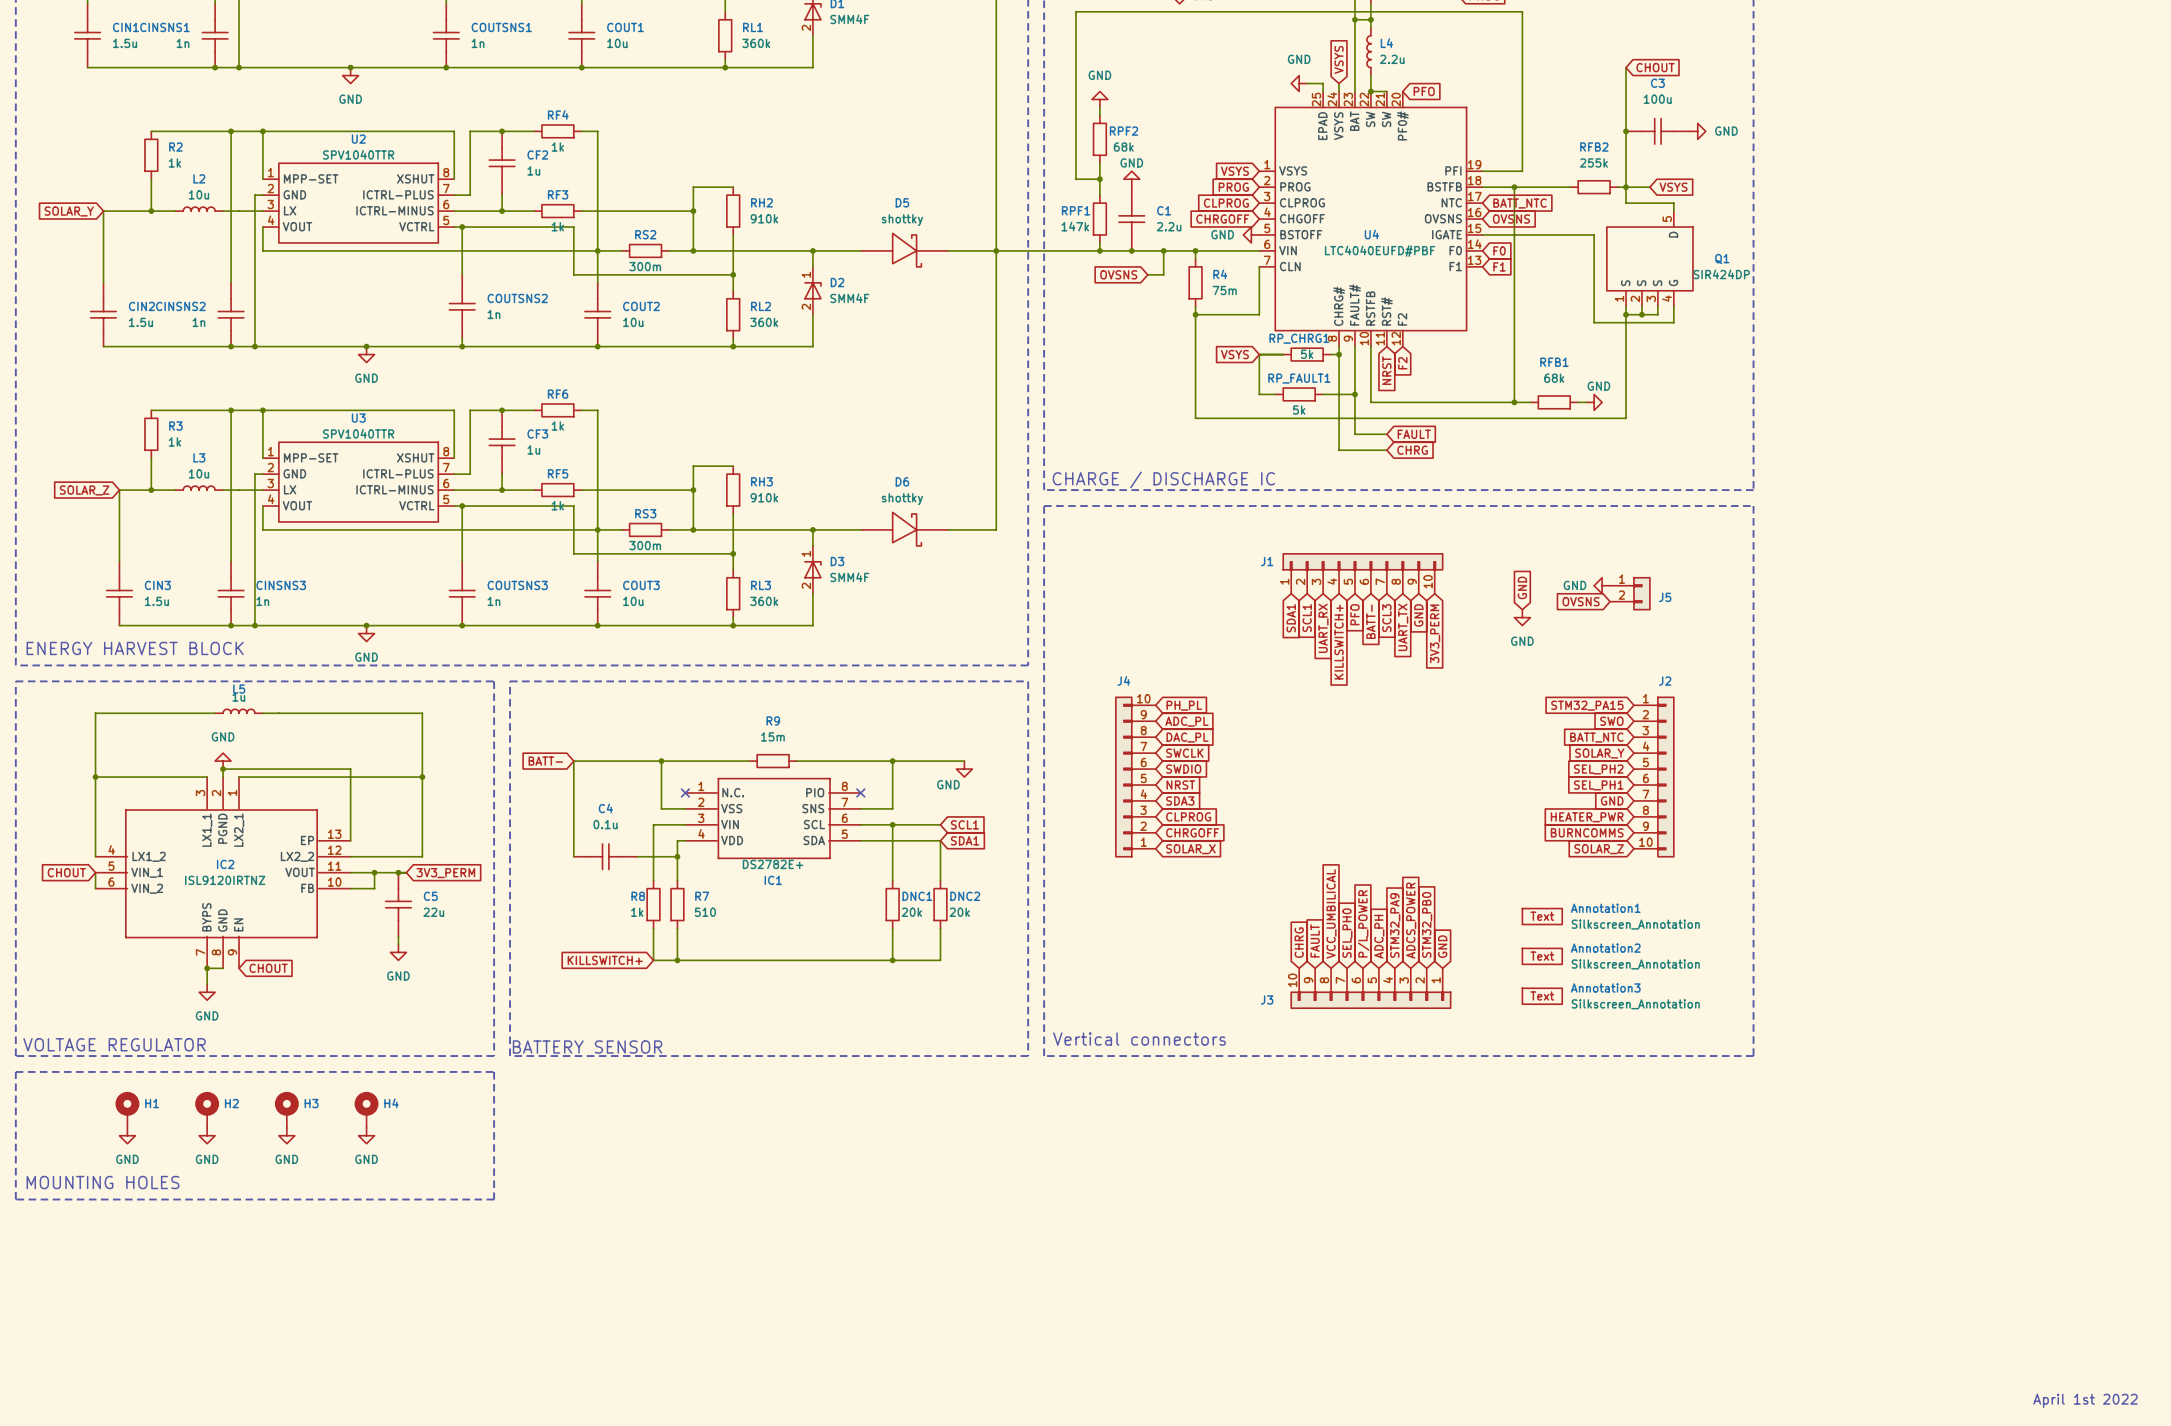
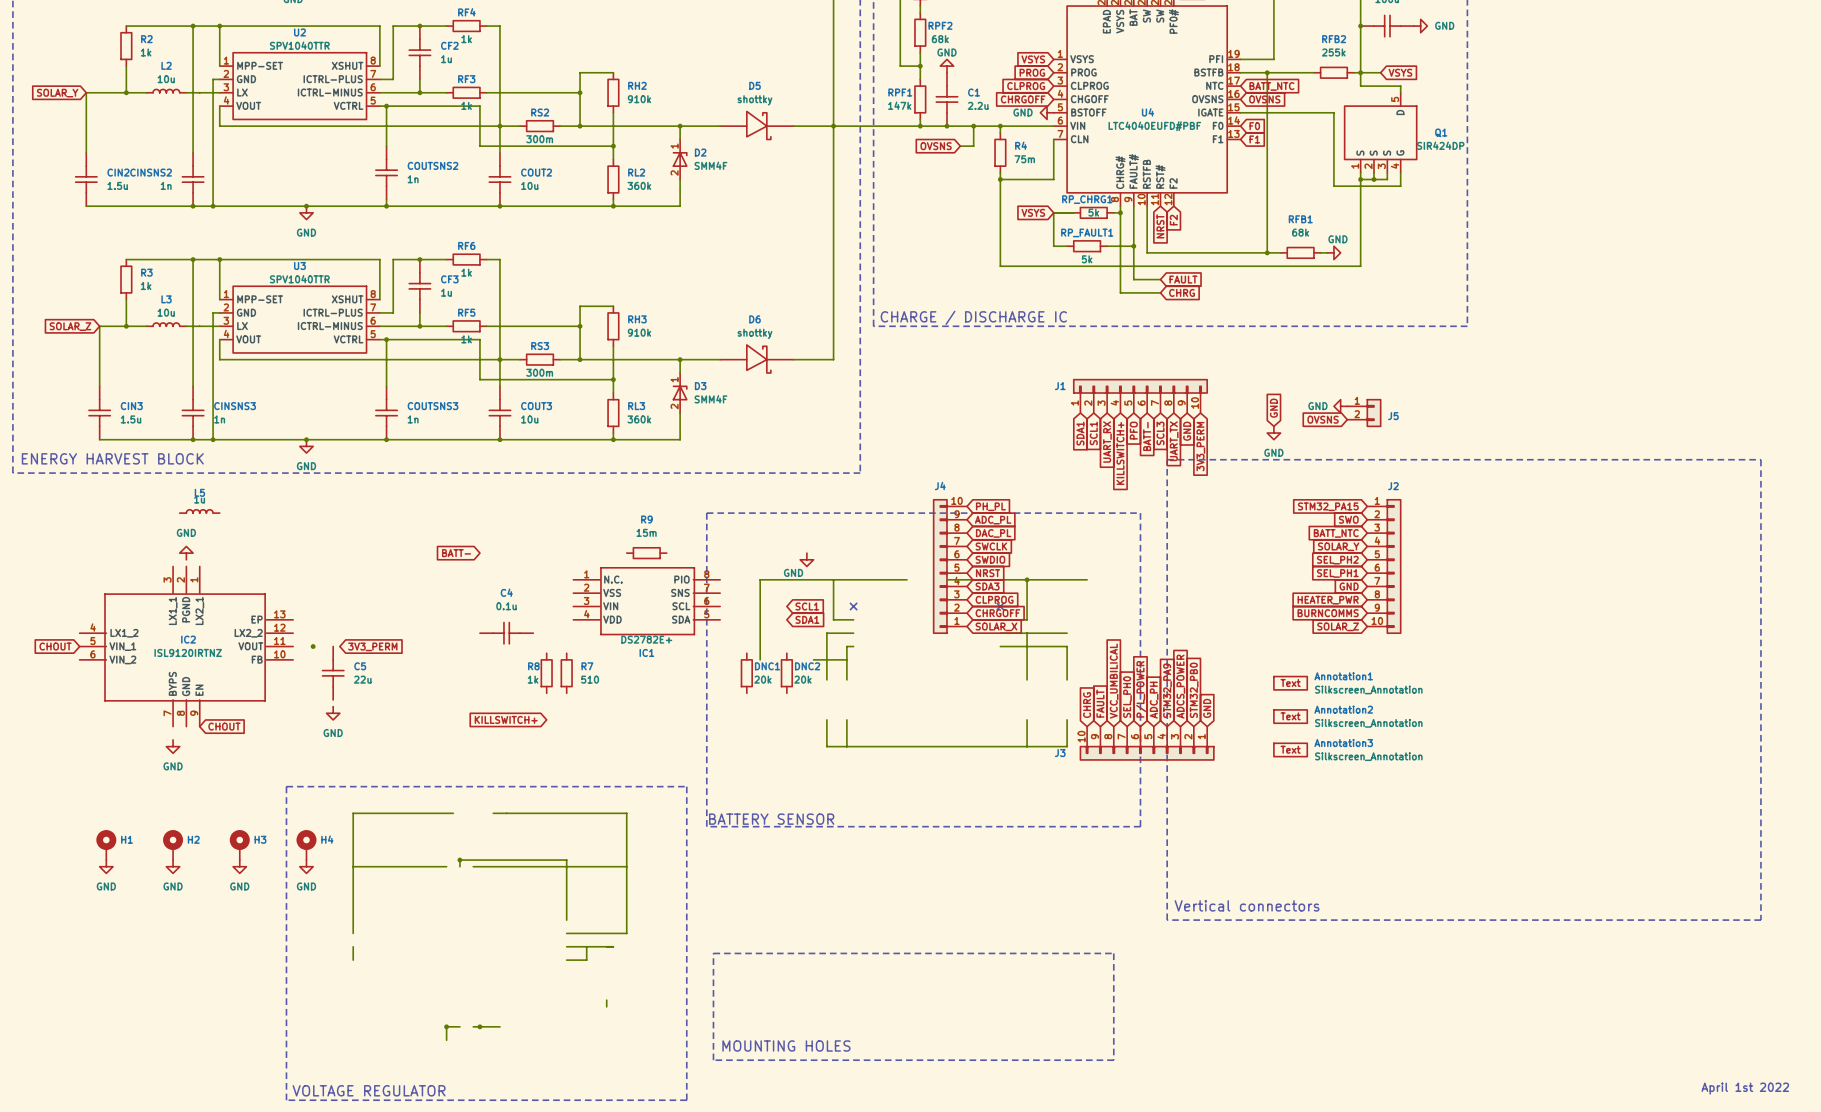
line: (1044, 506) (1753, 506) (1753, 1056) (1044, 1056) (1044, 506) -> none
line: none -> (1167, 459) (1760, 459) (1760, 920) (1167, 920) (1167, 459)
line: (15, 681) (494, 681) (494, 1056) (15, 1056) (15, 681) -> none
line: (510, 681) (1028, 681) (1028, 1056) (510, 1056) (510, 681) -> none
wire: (215, 713) (95, 713) (95, 856) -> none
wire: (262, 713) (422, 713) (422, 856) (350, 856) -> none
line: none -> (706, 513) (1140, 513) (1140, 826) (706, 826) (706, 513)
wire: (661, 761) (661, 808) (685, 808) -> none
junction: (661, 761) -> none
wire: (749, 761) (573, 761) (573, 856) -> none
wire: (797, 761) (964, 761) -> none
wire: (892, 761) (892, 808) (860, 808) -> none
junction: (892, 761) -> none
junction: (223, 769) -> none
wire: (95, 777) (207, 777) -> none
junction: (95, 777) -> none
wire: (223, 777) (223, 769) (350, 769) (350, 840) -> none
wire: (239, 777) (422, 777) -> none
junction: (422, 777) -> none
no-connect mark: (685, 792) -> none
no-connect mark: (860, 792) -> none
wire: none -> (833, 579) (833, 619) (853, 619)
wire: none -> (906, 579) (760, 579) (760, 659)
wire: none -> (946, 579) (1087, 579)
wire: none -> (1027, 579) (1027, 619) (1000, 619)
junction: none -> (1027, 579)
wire: (685, 824) (653, 824) (653, 880) -> none
wire: (860, 824) (940, 824) -> none
wire: (892, 824) (892, 880) -> none
junction: (892, 824) -> none
no-connect mark: none -> (853, 606)
no-connect mark: none -> (1000, 606)
wire: (685, 840) (677, 840) (677, 880) -> none
wire: (860, 840) (940, 840) (940, 880) -> none
wire: (637, 856) (677, 856) -> none
junction: (677, 856) -> none
wire: none -> (853, 633) (826, 633) (826, 679)
wire: none -> (1000, 633) (1067, 633)
wire: none -> (1027, 633) (1027, 679)
wire: (95, 872) (95, 888) -> none
wire: (350, 872) (406, 872) -> none
wire: (374, 872) (374, 888) (350, 888) -> none
junction: (398, 872) -> none
wire: none -> (853, 646) (846, 646) (846, 679)
wire: none -> (1000, 646) (1067, 646) (1067, 679)
wire: none -> (813, 659) (846, 659)
wire: (653, 928) (653, 960) (940, 960) (940, 928) -> none
wire: (677, 928) (677, 960) -> none
wire: (892, 928) (892, 960) -> (846, 719) (846, 746)
wire: (398, 936) (398, 944) -> none
junction: (677, 960) -> none
junction: (892, 960) -> none
wire: none -> (826, 719) (826, 746) (1067, 746) (1067, 719)
wire: none -> (1027, 719) (1027, 746)
junction: (207, 968) -> none
wire: (223, 968) (207, 968) (207, 984) -> none
text: Vertical connectors (1139, 1039) -> none
line: none -> (286, 786) (686, 786) (686, 1100) (286, 1100) (286, 786)
text: VOLTAGE REGULATOR (114, 1044) -> none
text: BATTERY SENSOR (587, 1047) -> none
line: (15, 1071) (15, 1199) (494, 1199) (494, 1071) (15, 1071) -> none
wire: none -> (453, 813) (353, 813) (353, 933)
wire: none -> (493, 813) (626, 813) (626, 933) (566, 933)
text: none -> BATTERY SENSOR (771, 819)
junction: none -> (459, 860)
wire: none -> (353, 866) (446, 866)
wire: none -> (459, 866) (459, 860) (566, 860) (566, 920)
wire: none -> (473, 866) (626, 866)
text: MOUNTING HOLES (103, 1182) -> none
text: none -> Vertical connectors (1247, 905)
wire: none -> (353, 946) (353, 960)
wire: none -> (566, 946) (613, 946)
wire: none -> (586, 946) (586, 960) (566, 960)
line: none -> (713, 953) (1113, 953) (1113, 1060) (713, 1060) (713, 953)
wire: none -> (606, 1000) (606, 1006)
junction: none -> (446, 1026)
wire: none -> (459, 1026) (446, 1026) (446, 1040)
wire: none -> (473, 1026) (499, 1026)
junction: none -> (479, 1026)
text: none -> MOUNTING HOLES (786, 1045)
text: none -> VOLTAGE REGULATOR (369, 1090)

